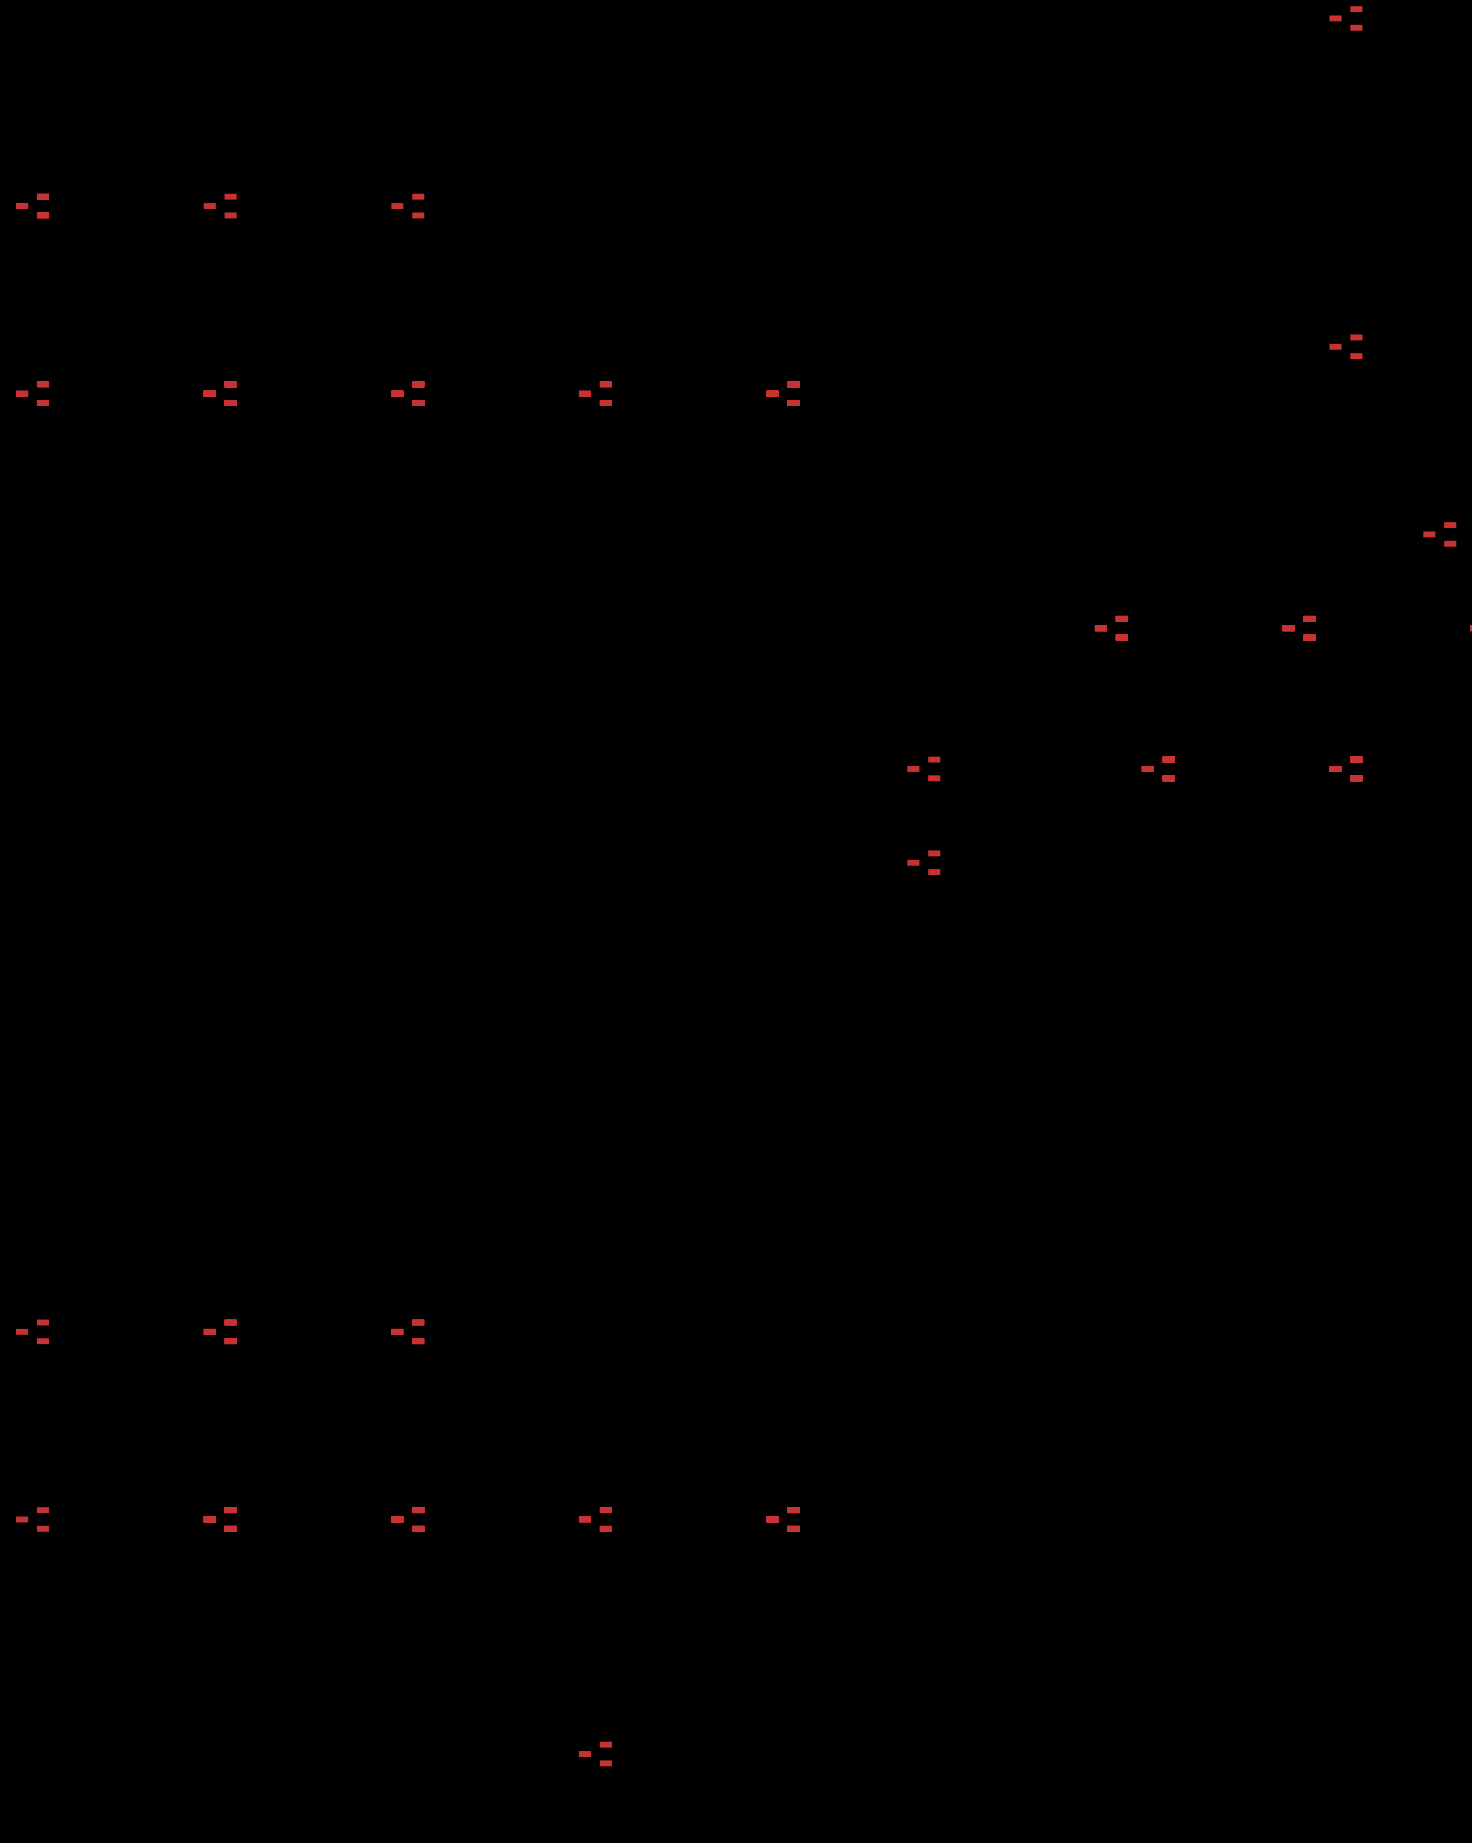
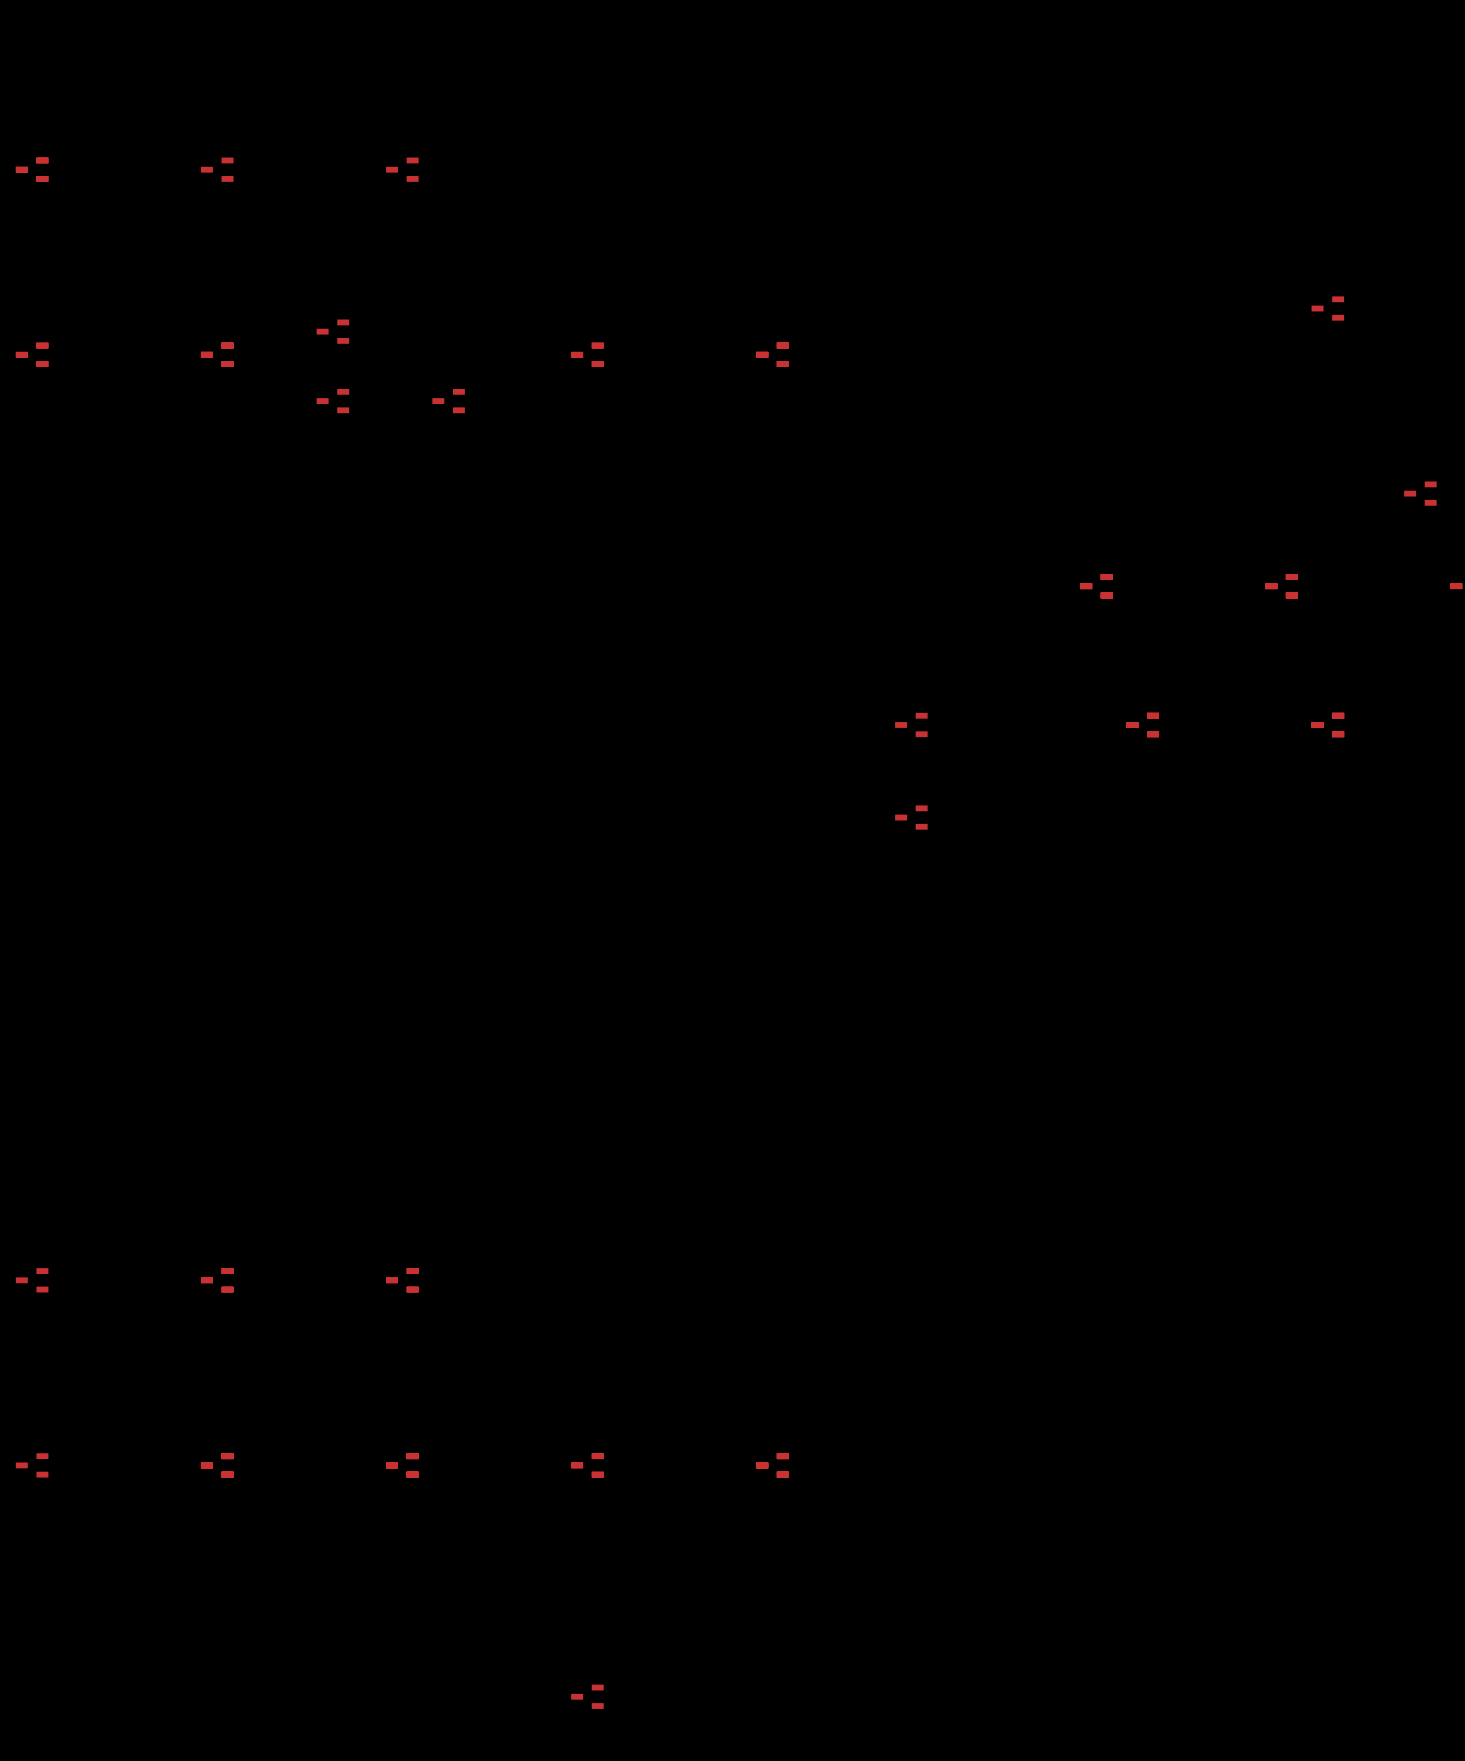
part: none -> (332, 331)
part: (407, 393) -> none
part: none -> (332, 401)
part: none -> (448, 401)

